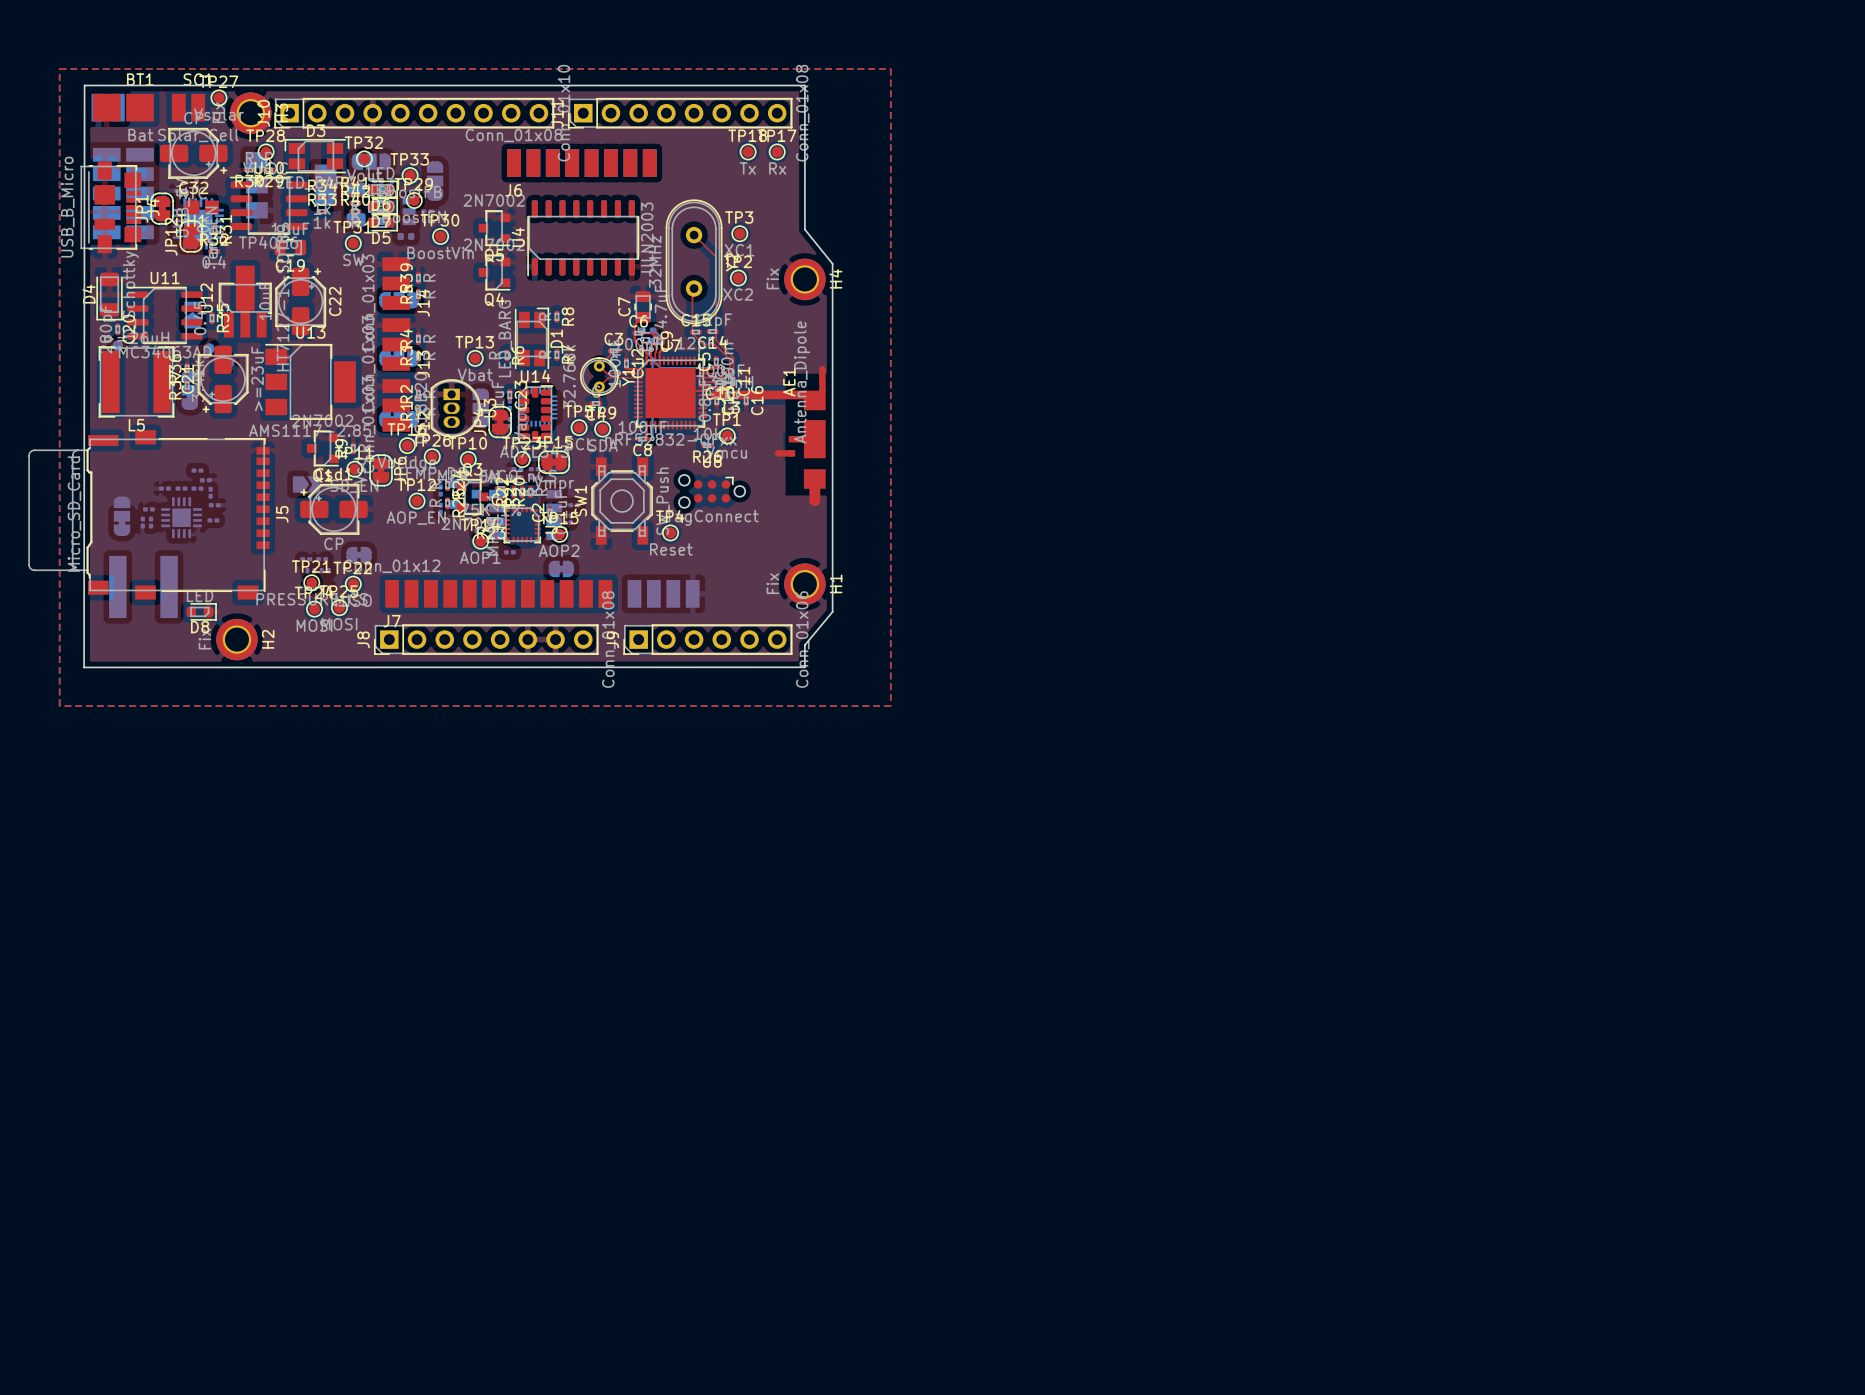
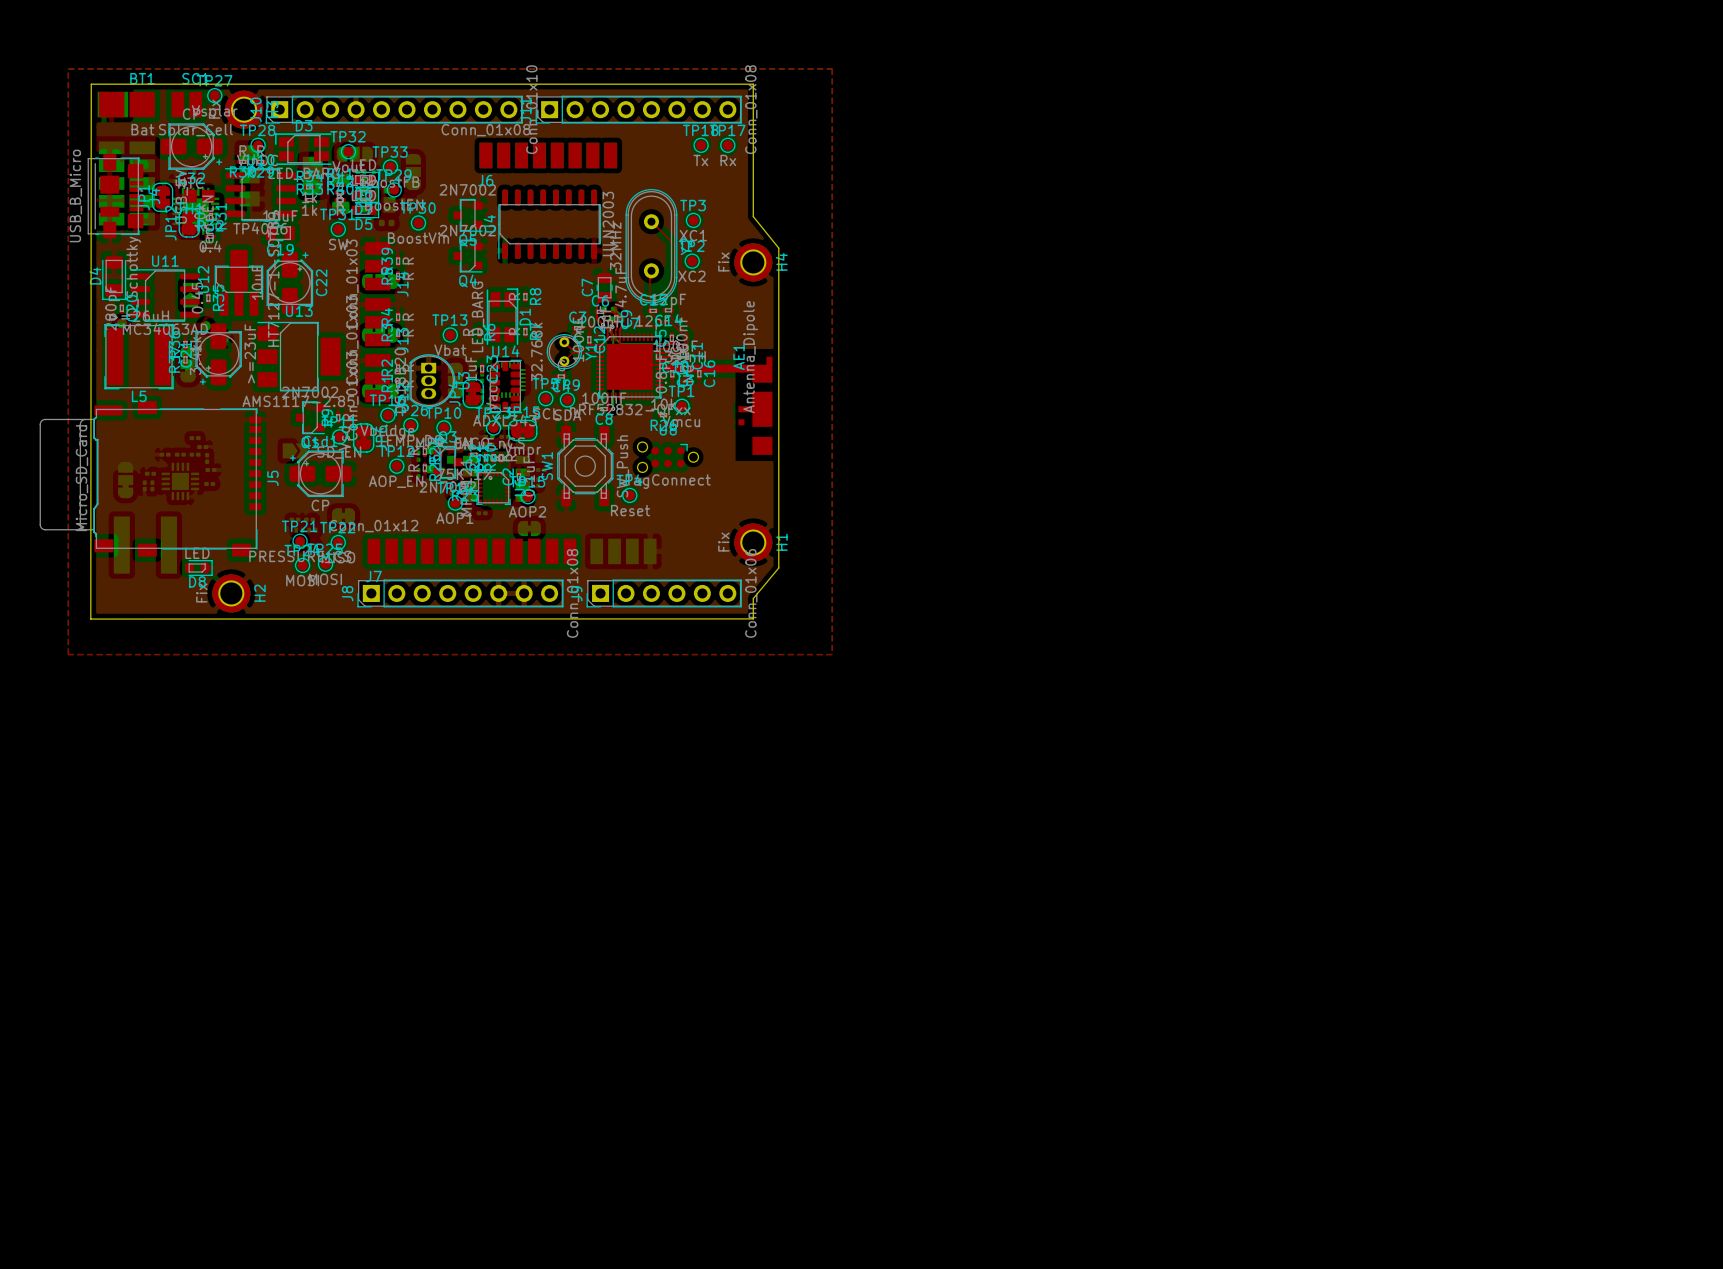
top track: (822, 369) (822, 383) -> none
top track: (778, 453) (791, 453) -> none
top track: (814, 479) (814, 500) -> none

